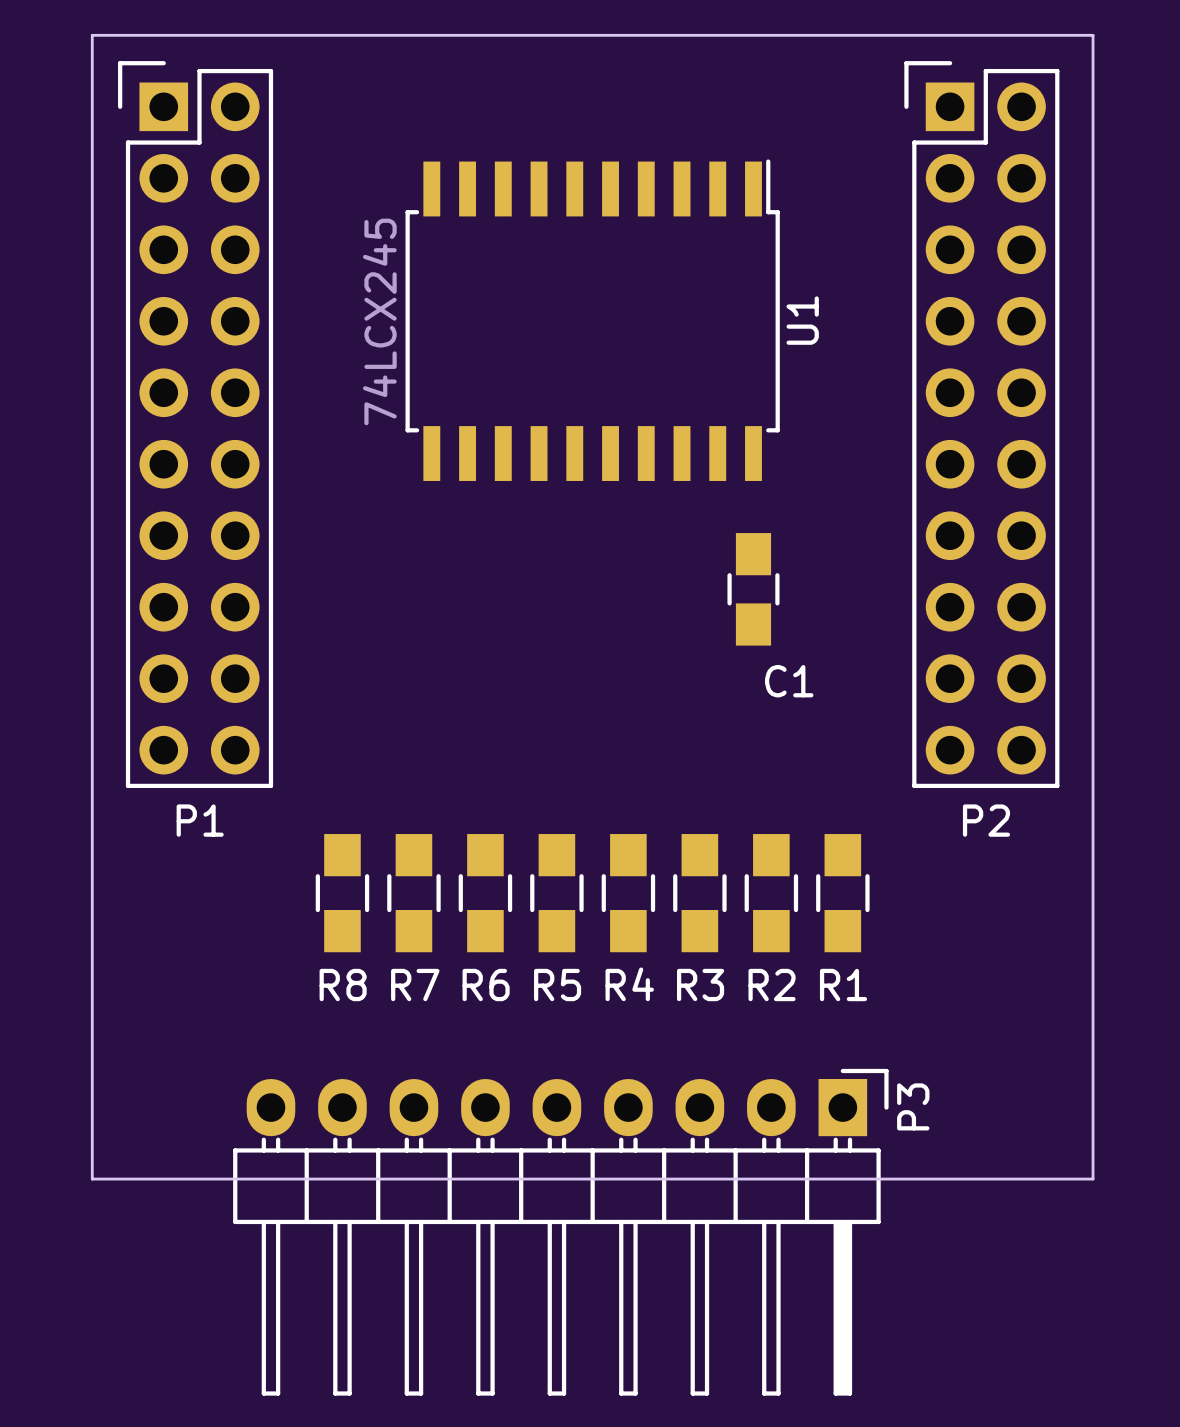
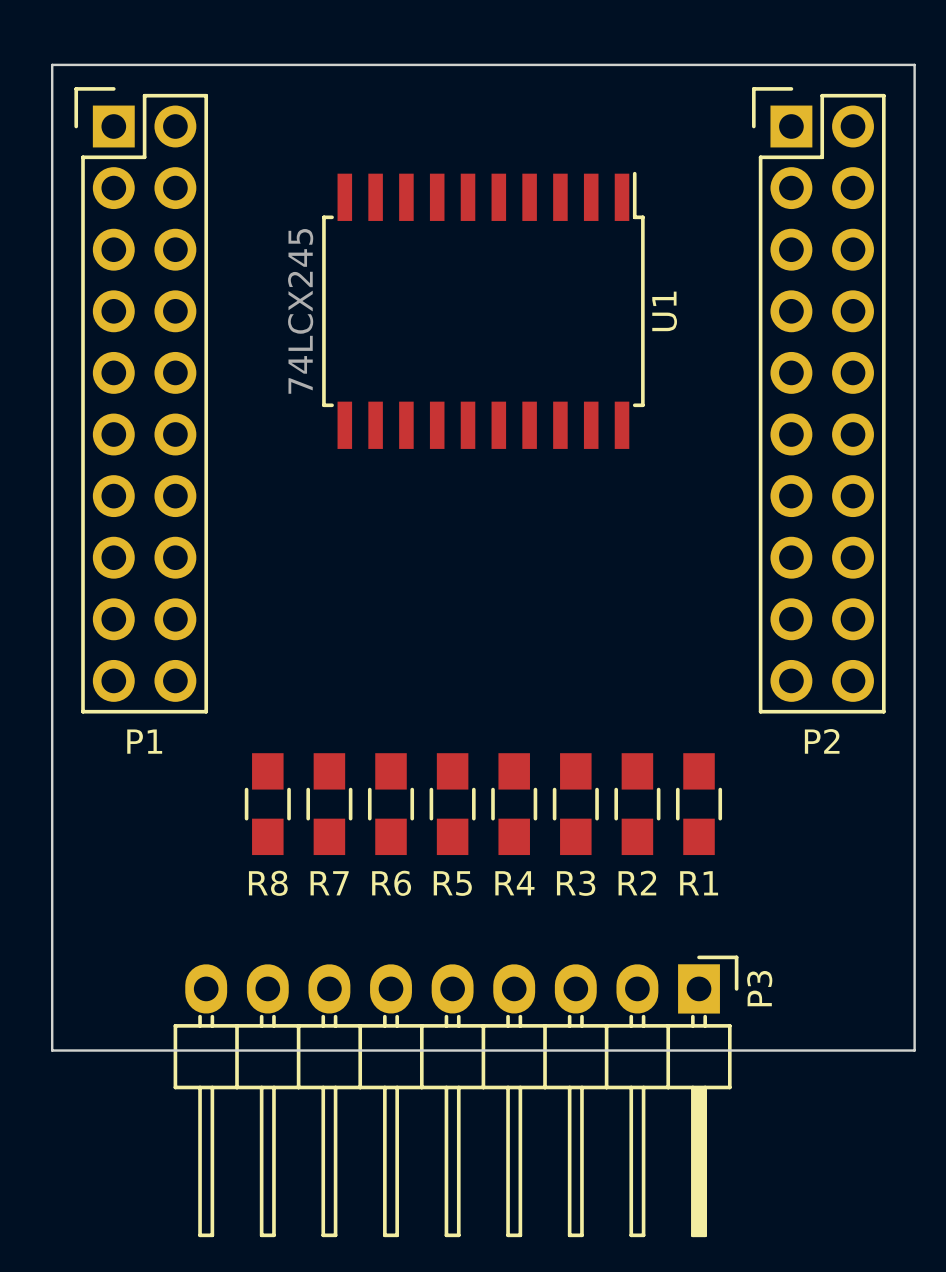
C1: (753, 589) -> none

